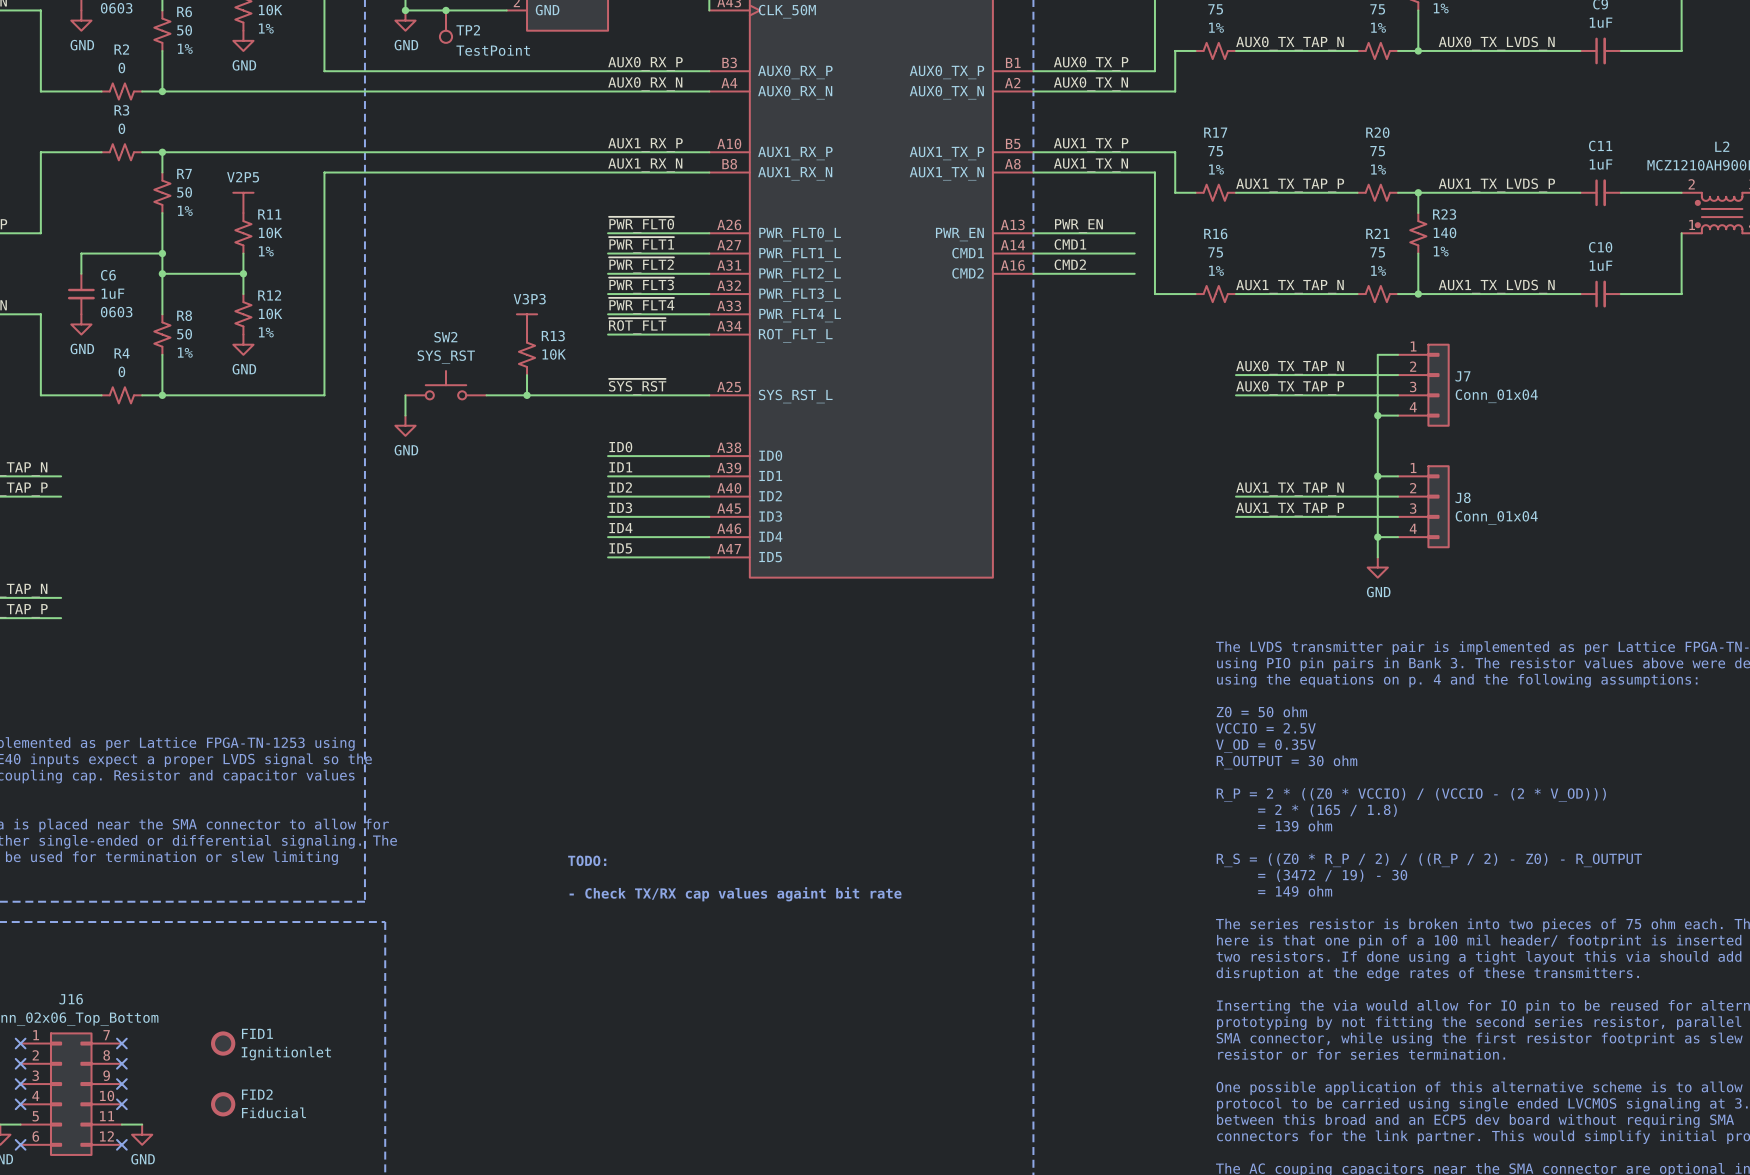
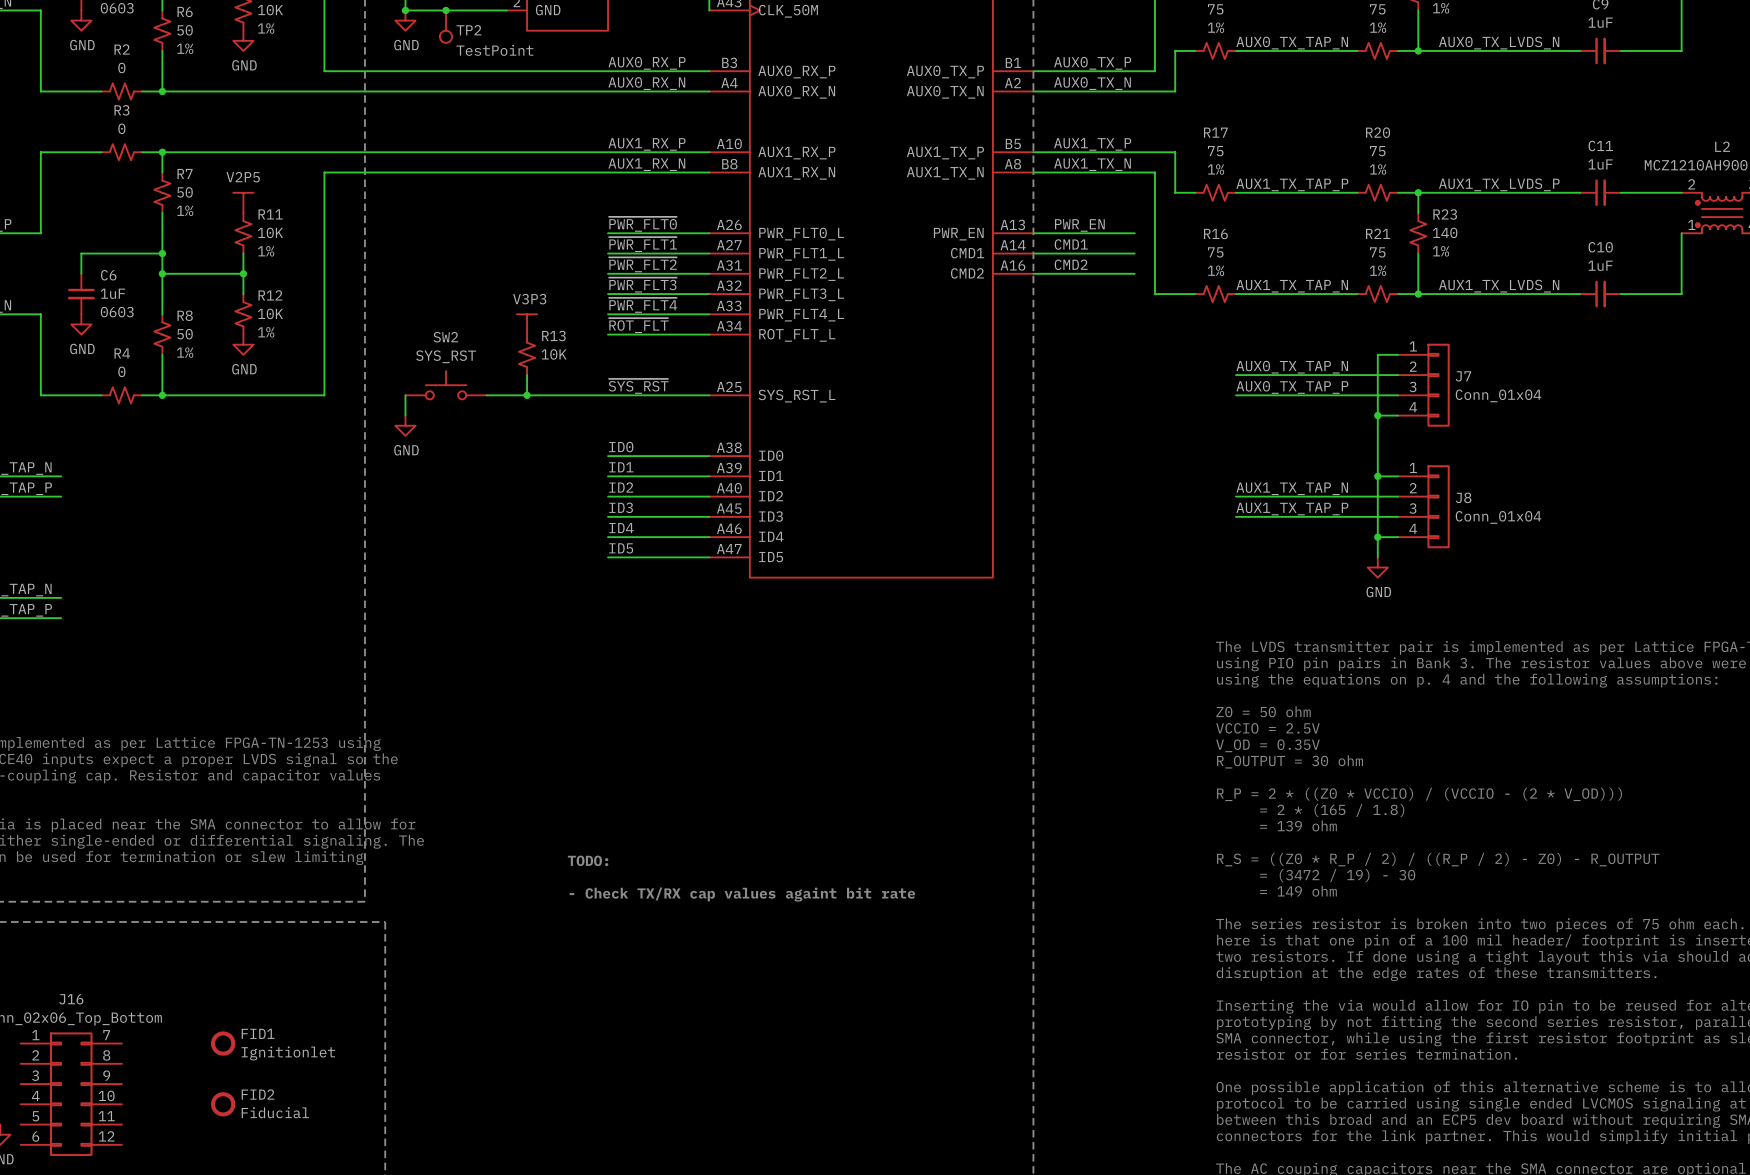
no-connect mark: (20, 1043) -> none
no-connect mark: (121, 1043) -> none
no-connect mark: (20, 1063) -> none
no-connect mark: (121, 1063) -> none
no-connect mark: (20, 1084) -> none
no-connect mark: (121, 1084) -> none
no-connect mark: (20, 1104) -> none
no-connect mark: (121, 1104) -> none
wire: (0, 1124) (20, 1124) -> none
wire: (121, 1124) (142, 1124) -> none
power symbol: GND (142, 1134) -> none
no-connect mark: (20, 1144) -> none
no-connect mark: (121, 1144) -> none

